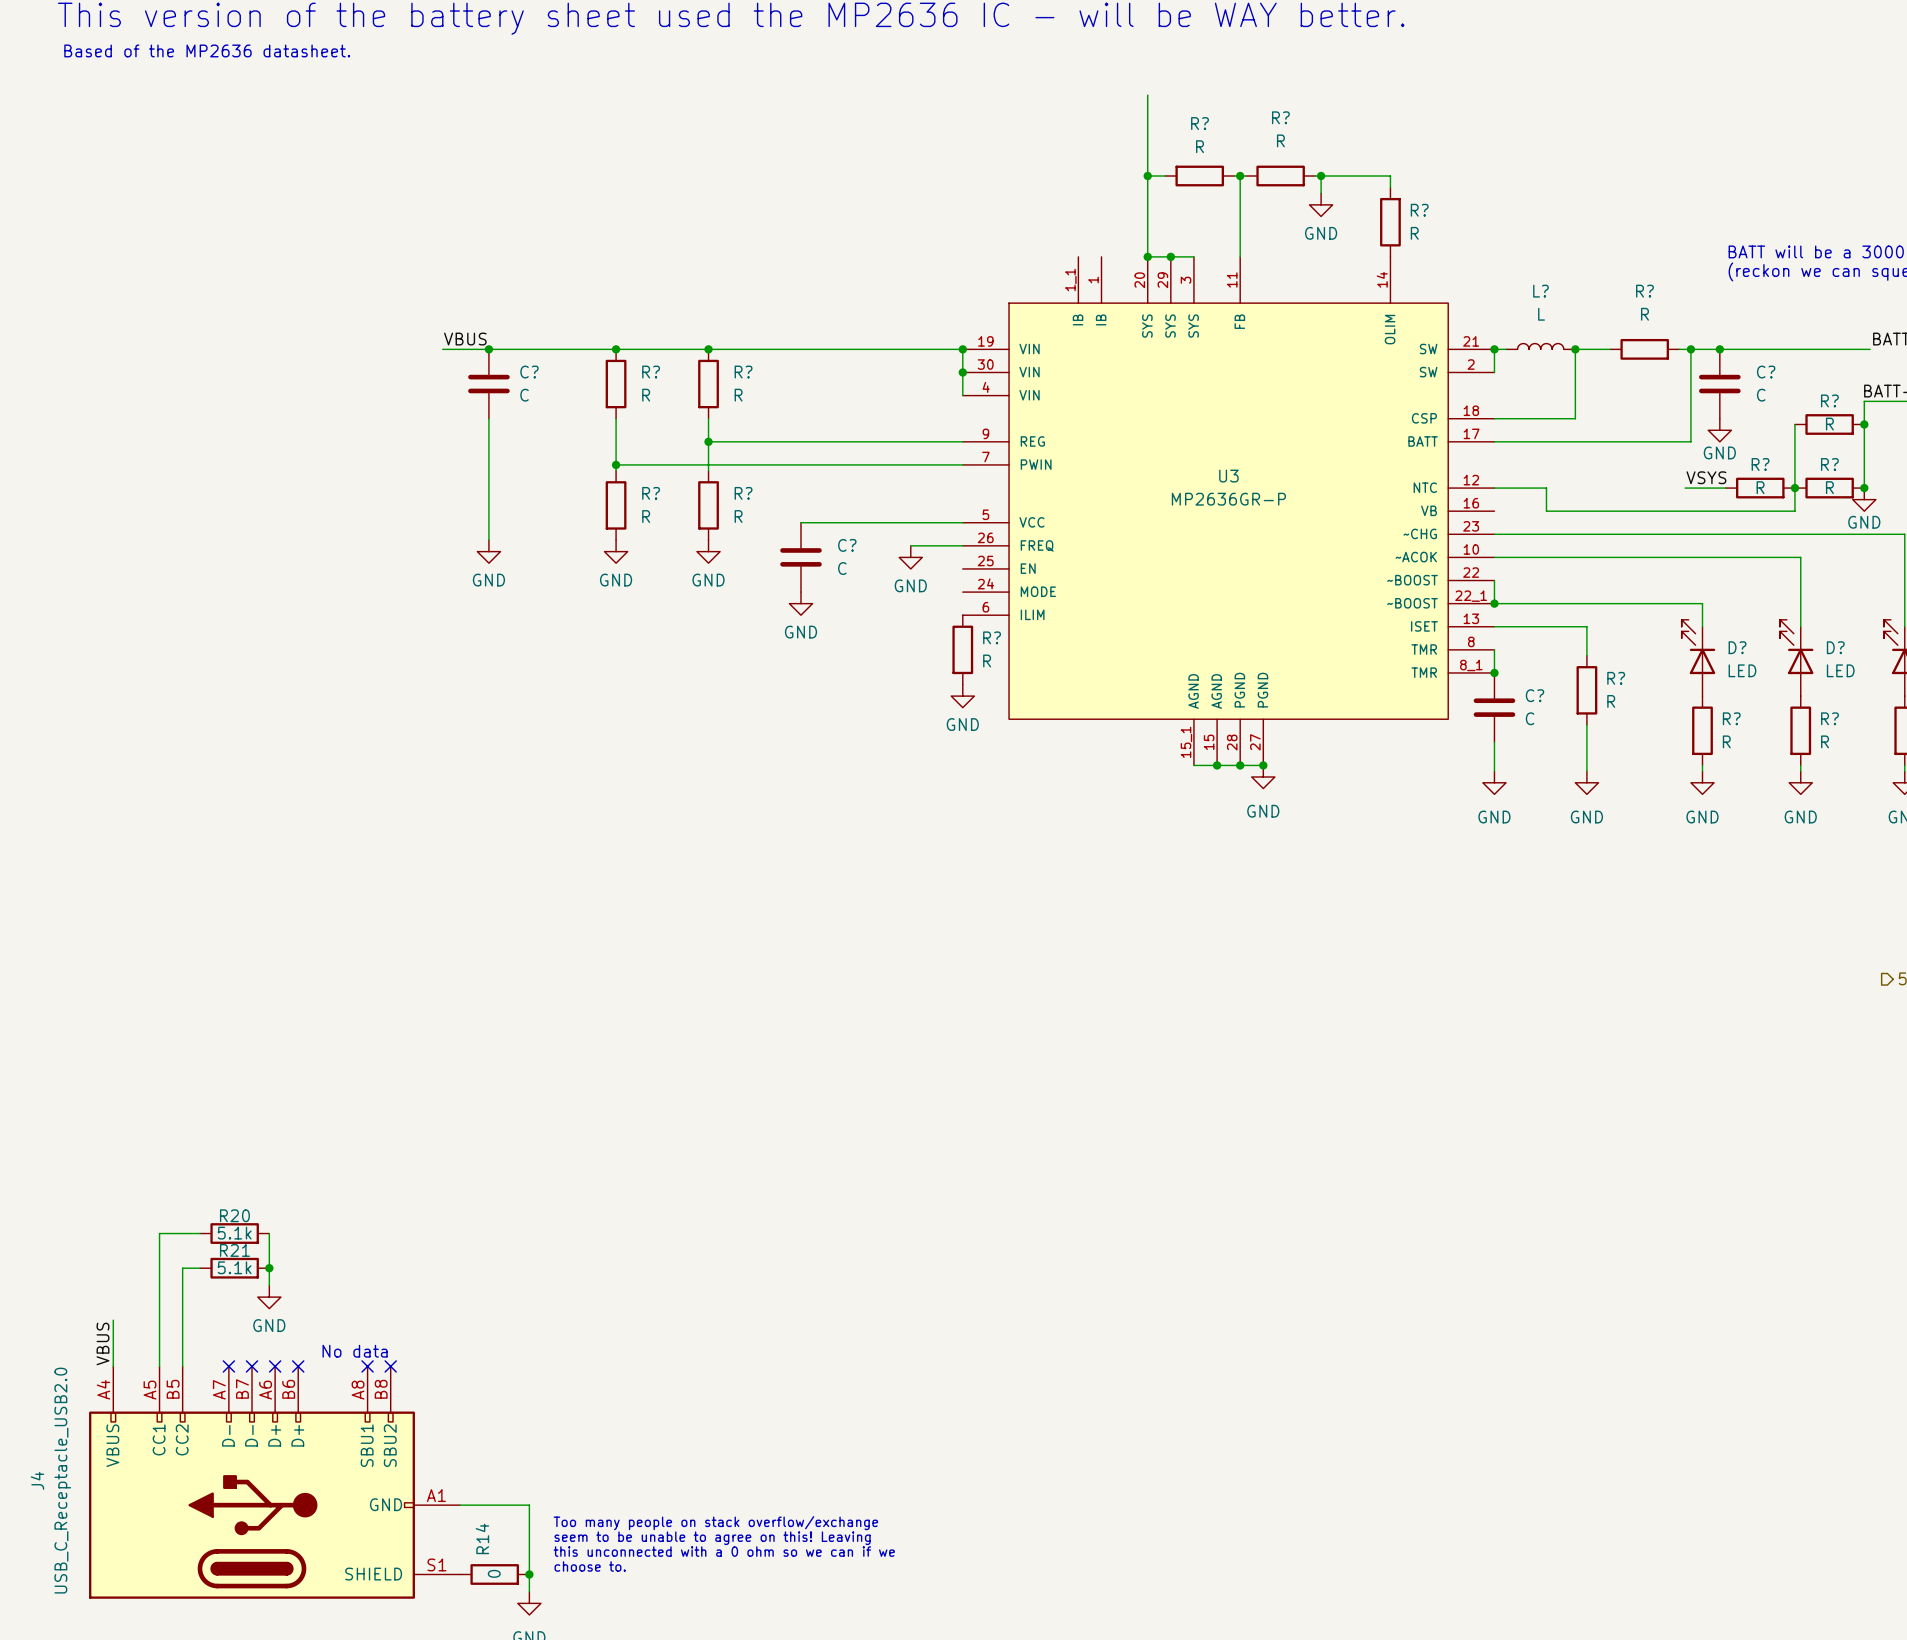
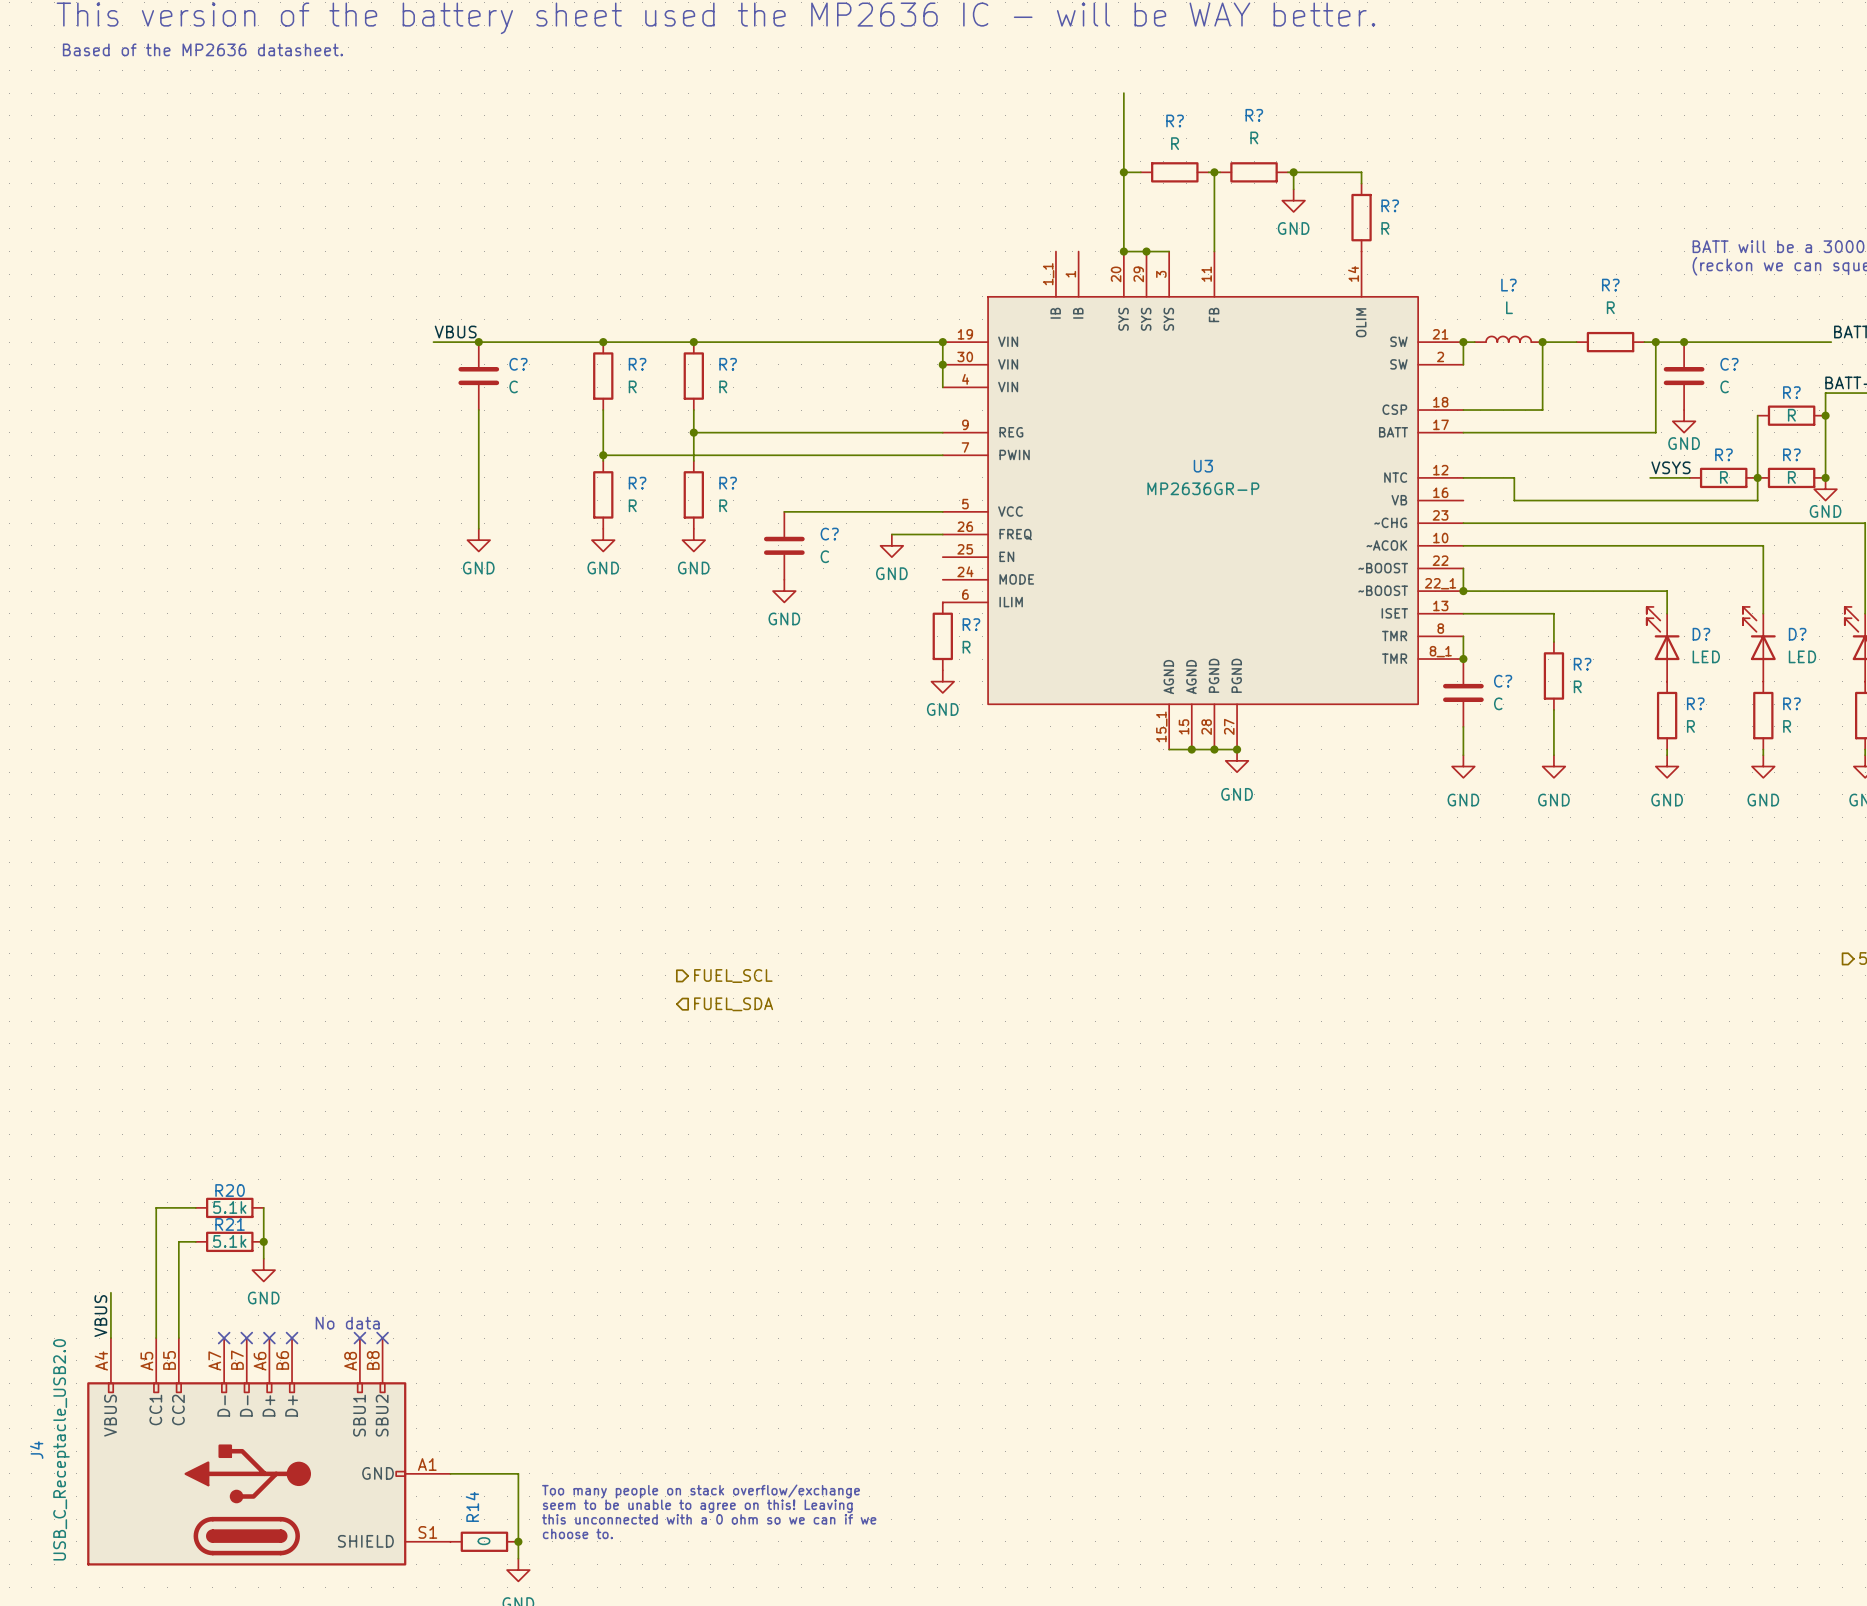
hierarchical label: none -> FUEL_SCL (733, 976)
hierarchical label: none -> FUEL_SDA (733, 1004)

